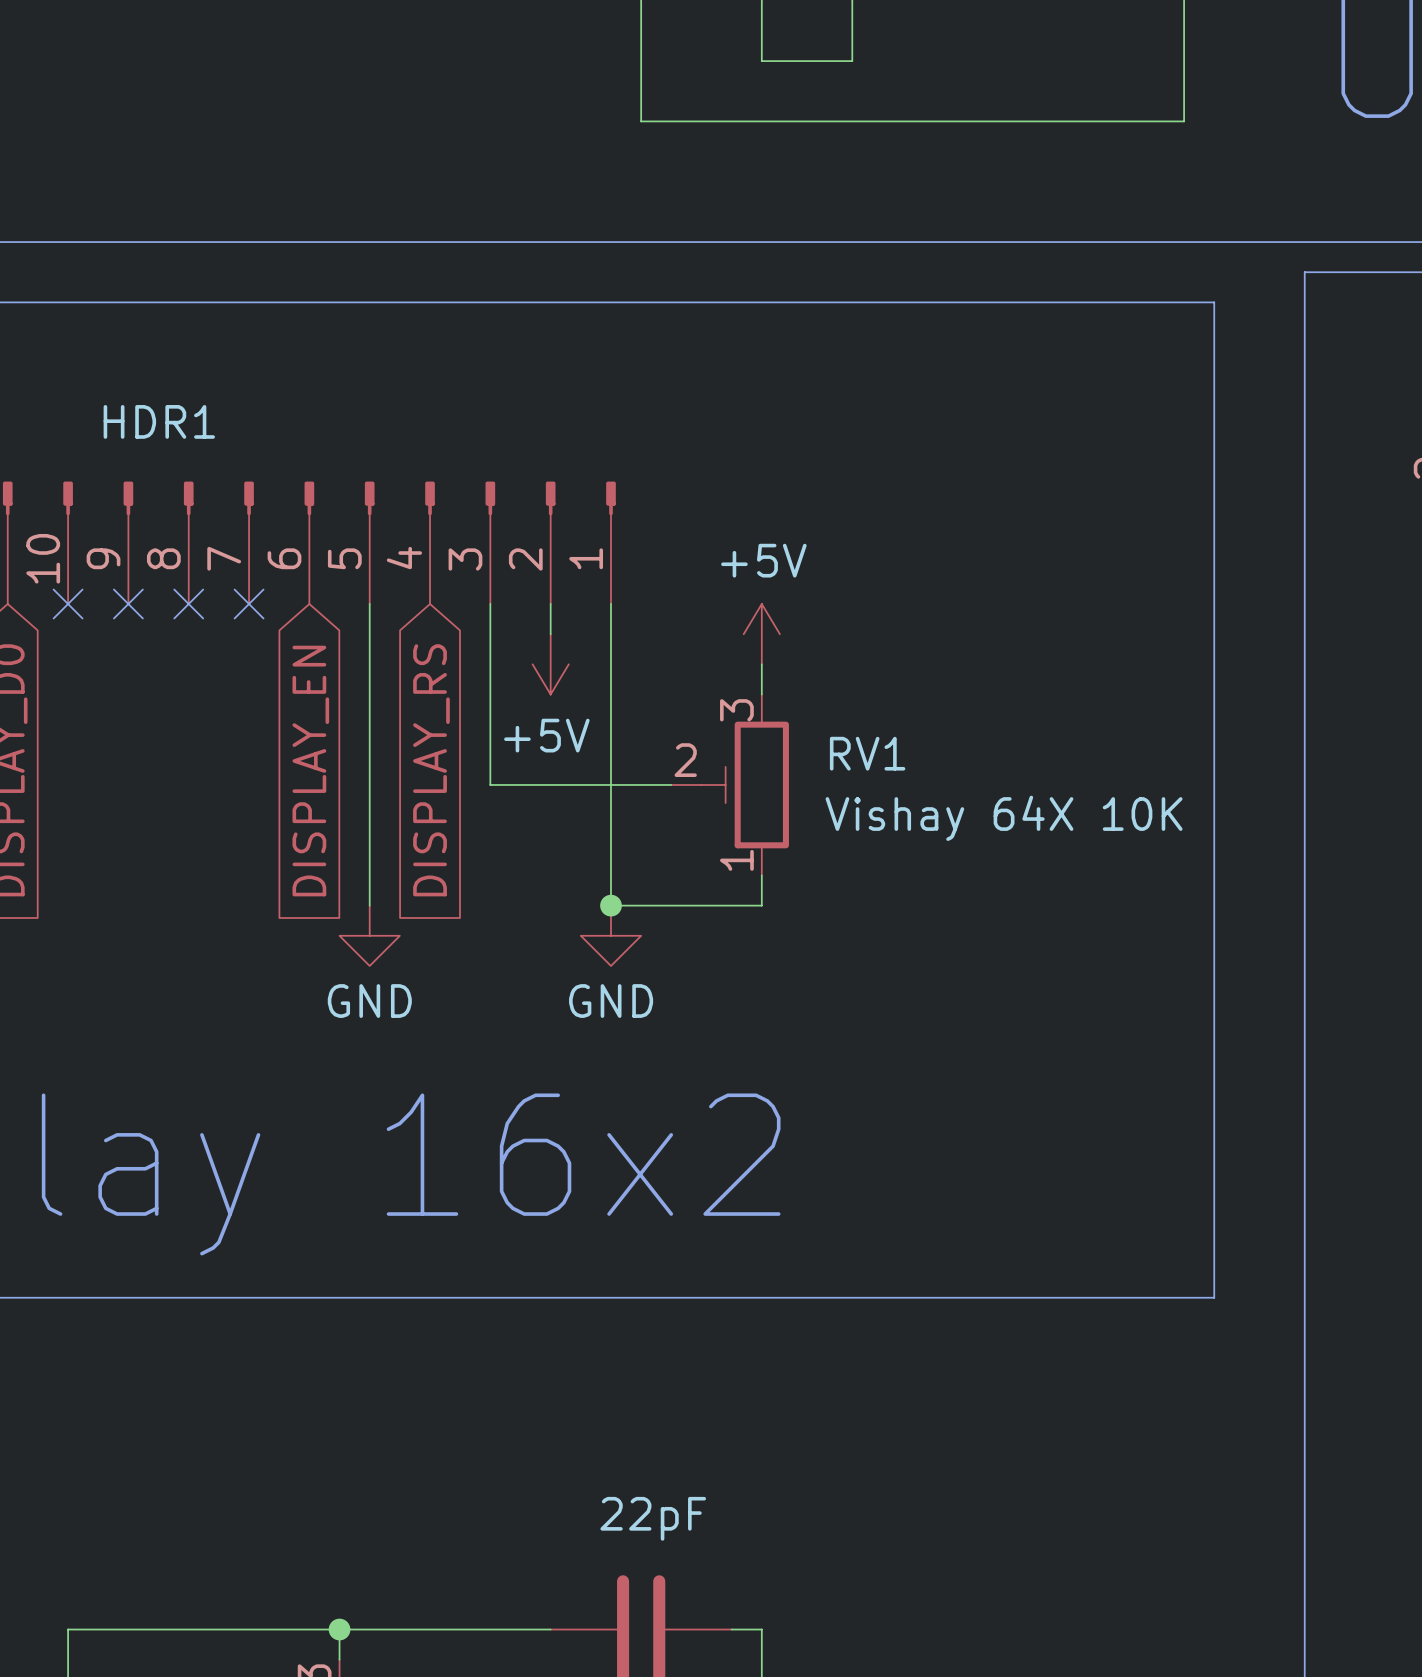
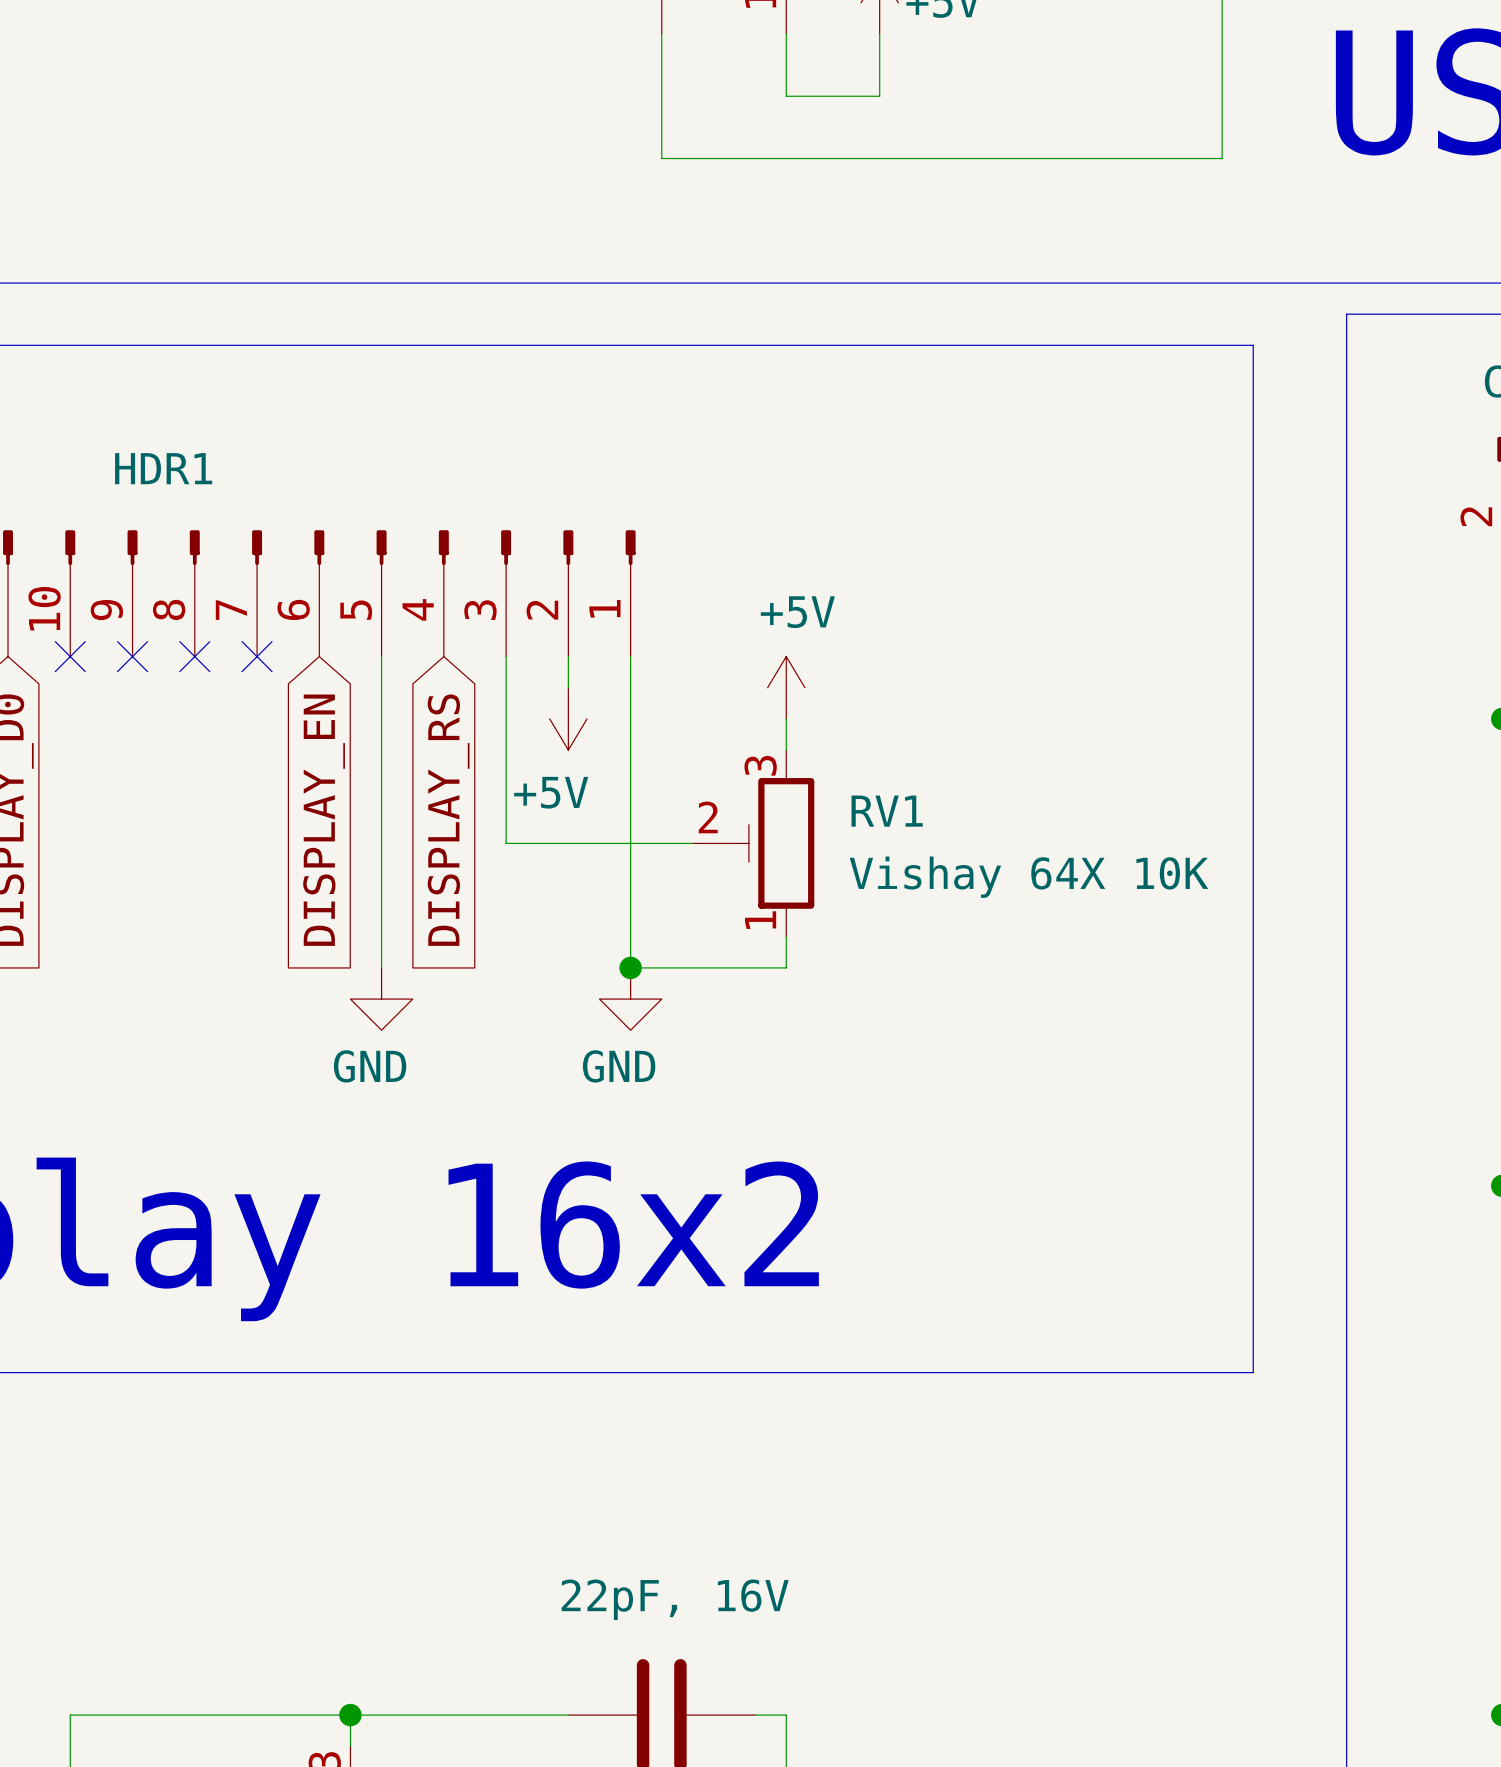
part value: 22pF (653, 1518) -> 22pF, 16V (675, 1599)

